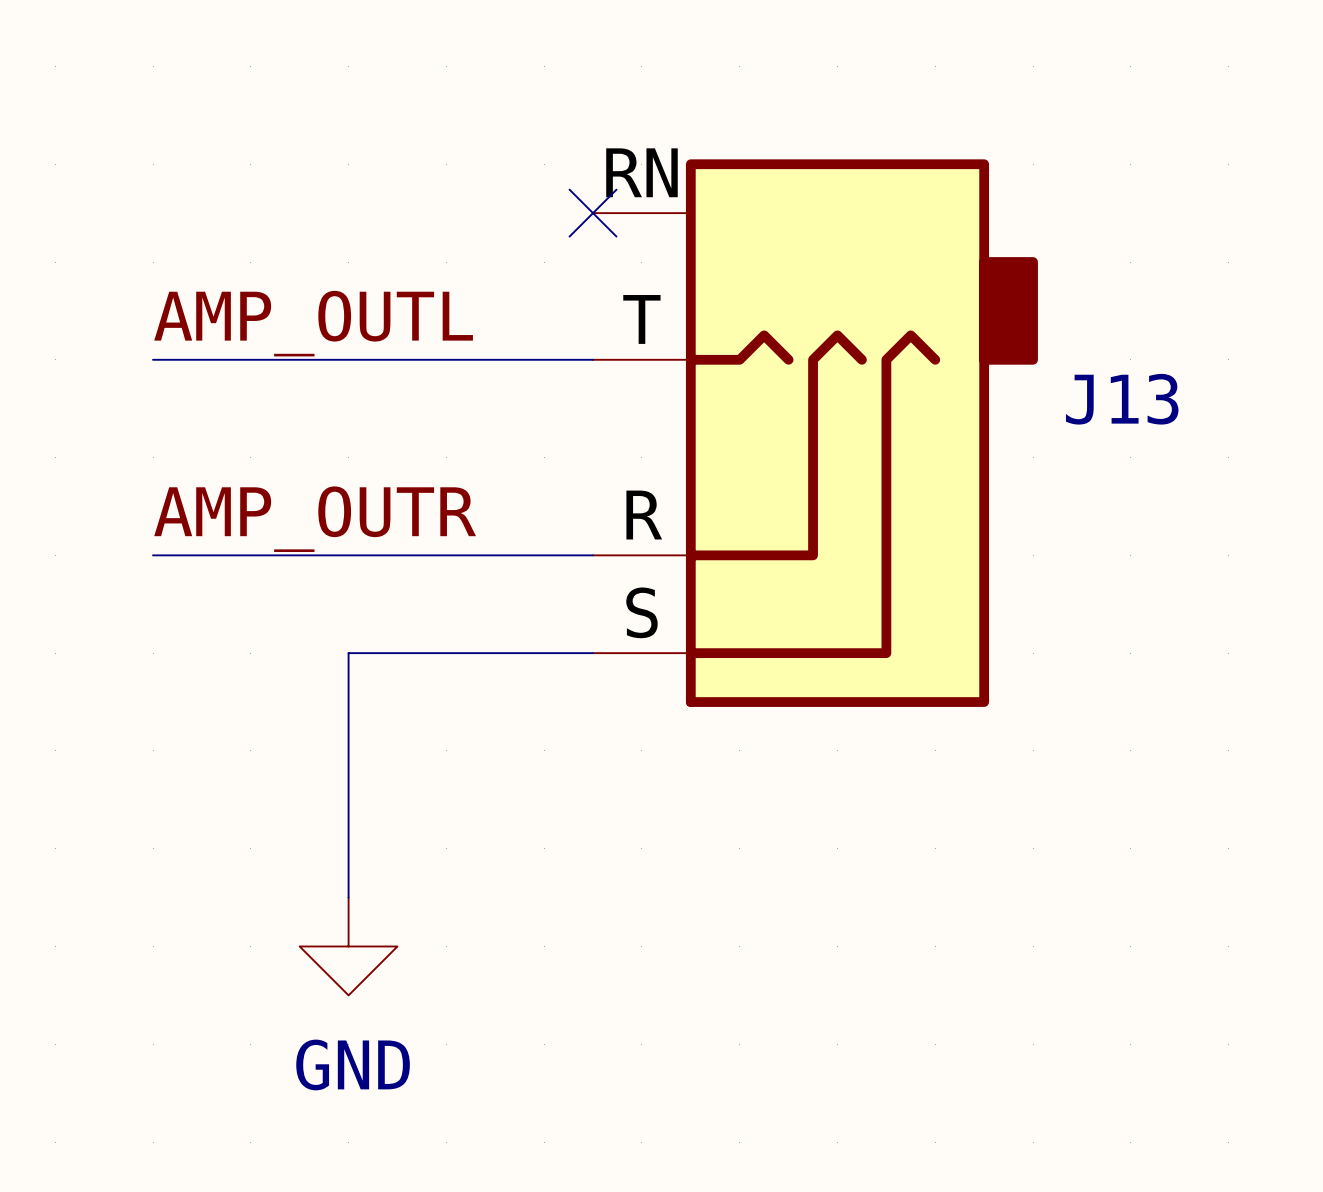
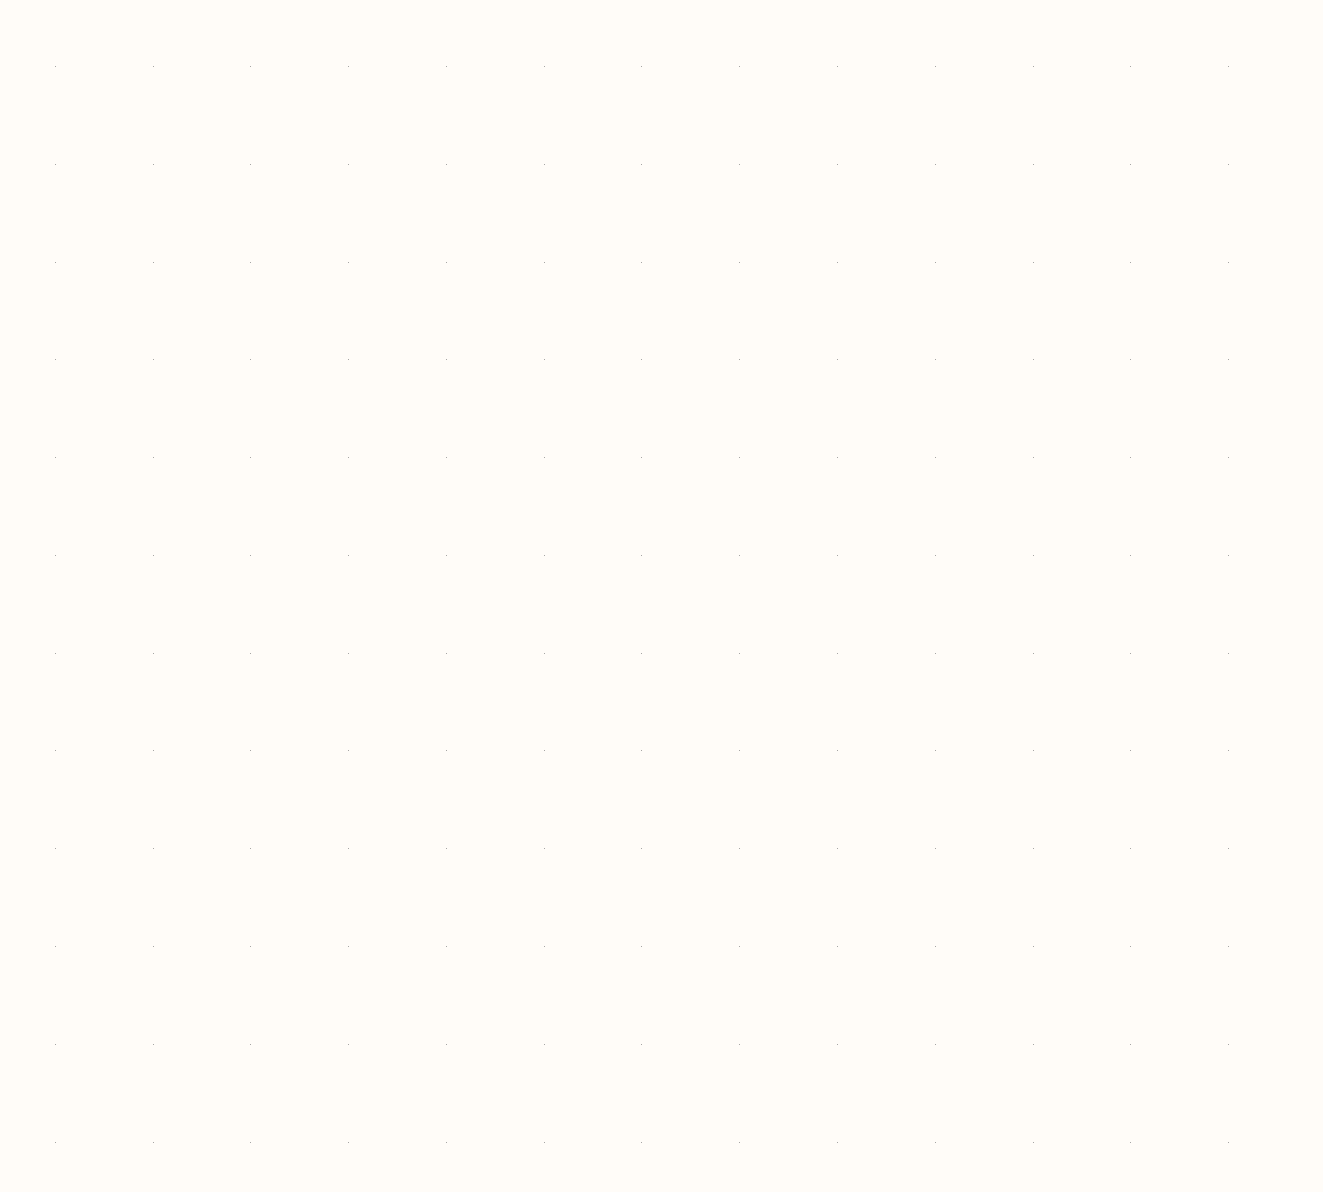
no-connect mark: (593, 213) -> none
label: AMP_OUTL (313, 323) -> none
wire: (153, 359) (593, 359) -> none
J13: (815, 433) -> none
label: AMP_OUTR (315, 519) -> none
wire: (153, 555) (593, 555) -> none
wire: (593, 653) (348, 653) (348, 897) -> none
power symbol: GND (348, 946) -> none

